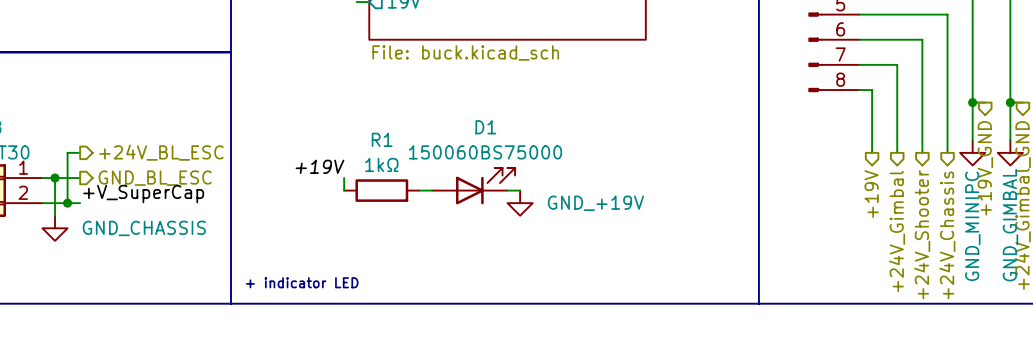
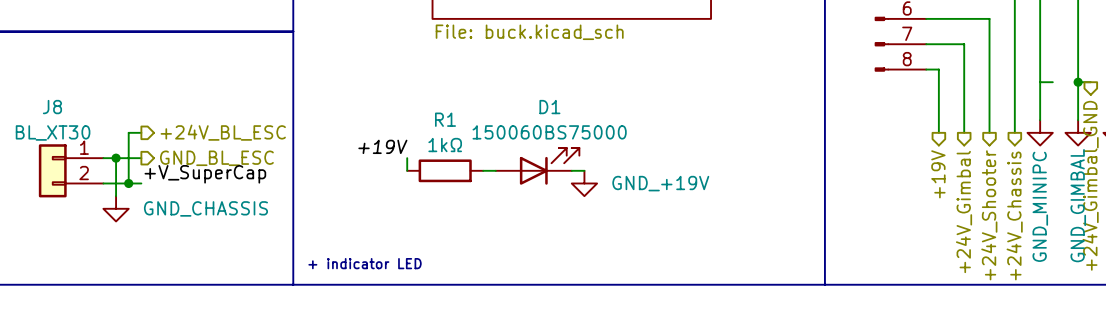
junction: (972, 102) -> none
hierarchical label: +19V_GND (985, 168) -> none

